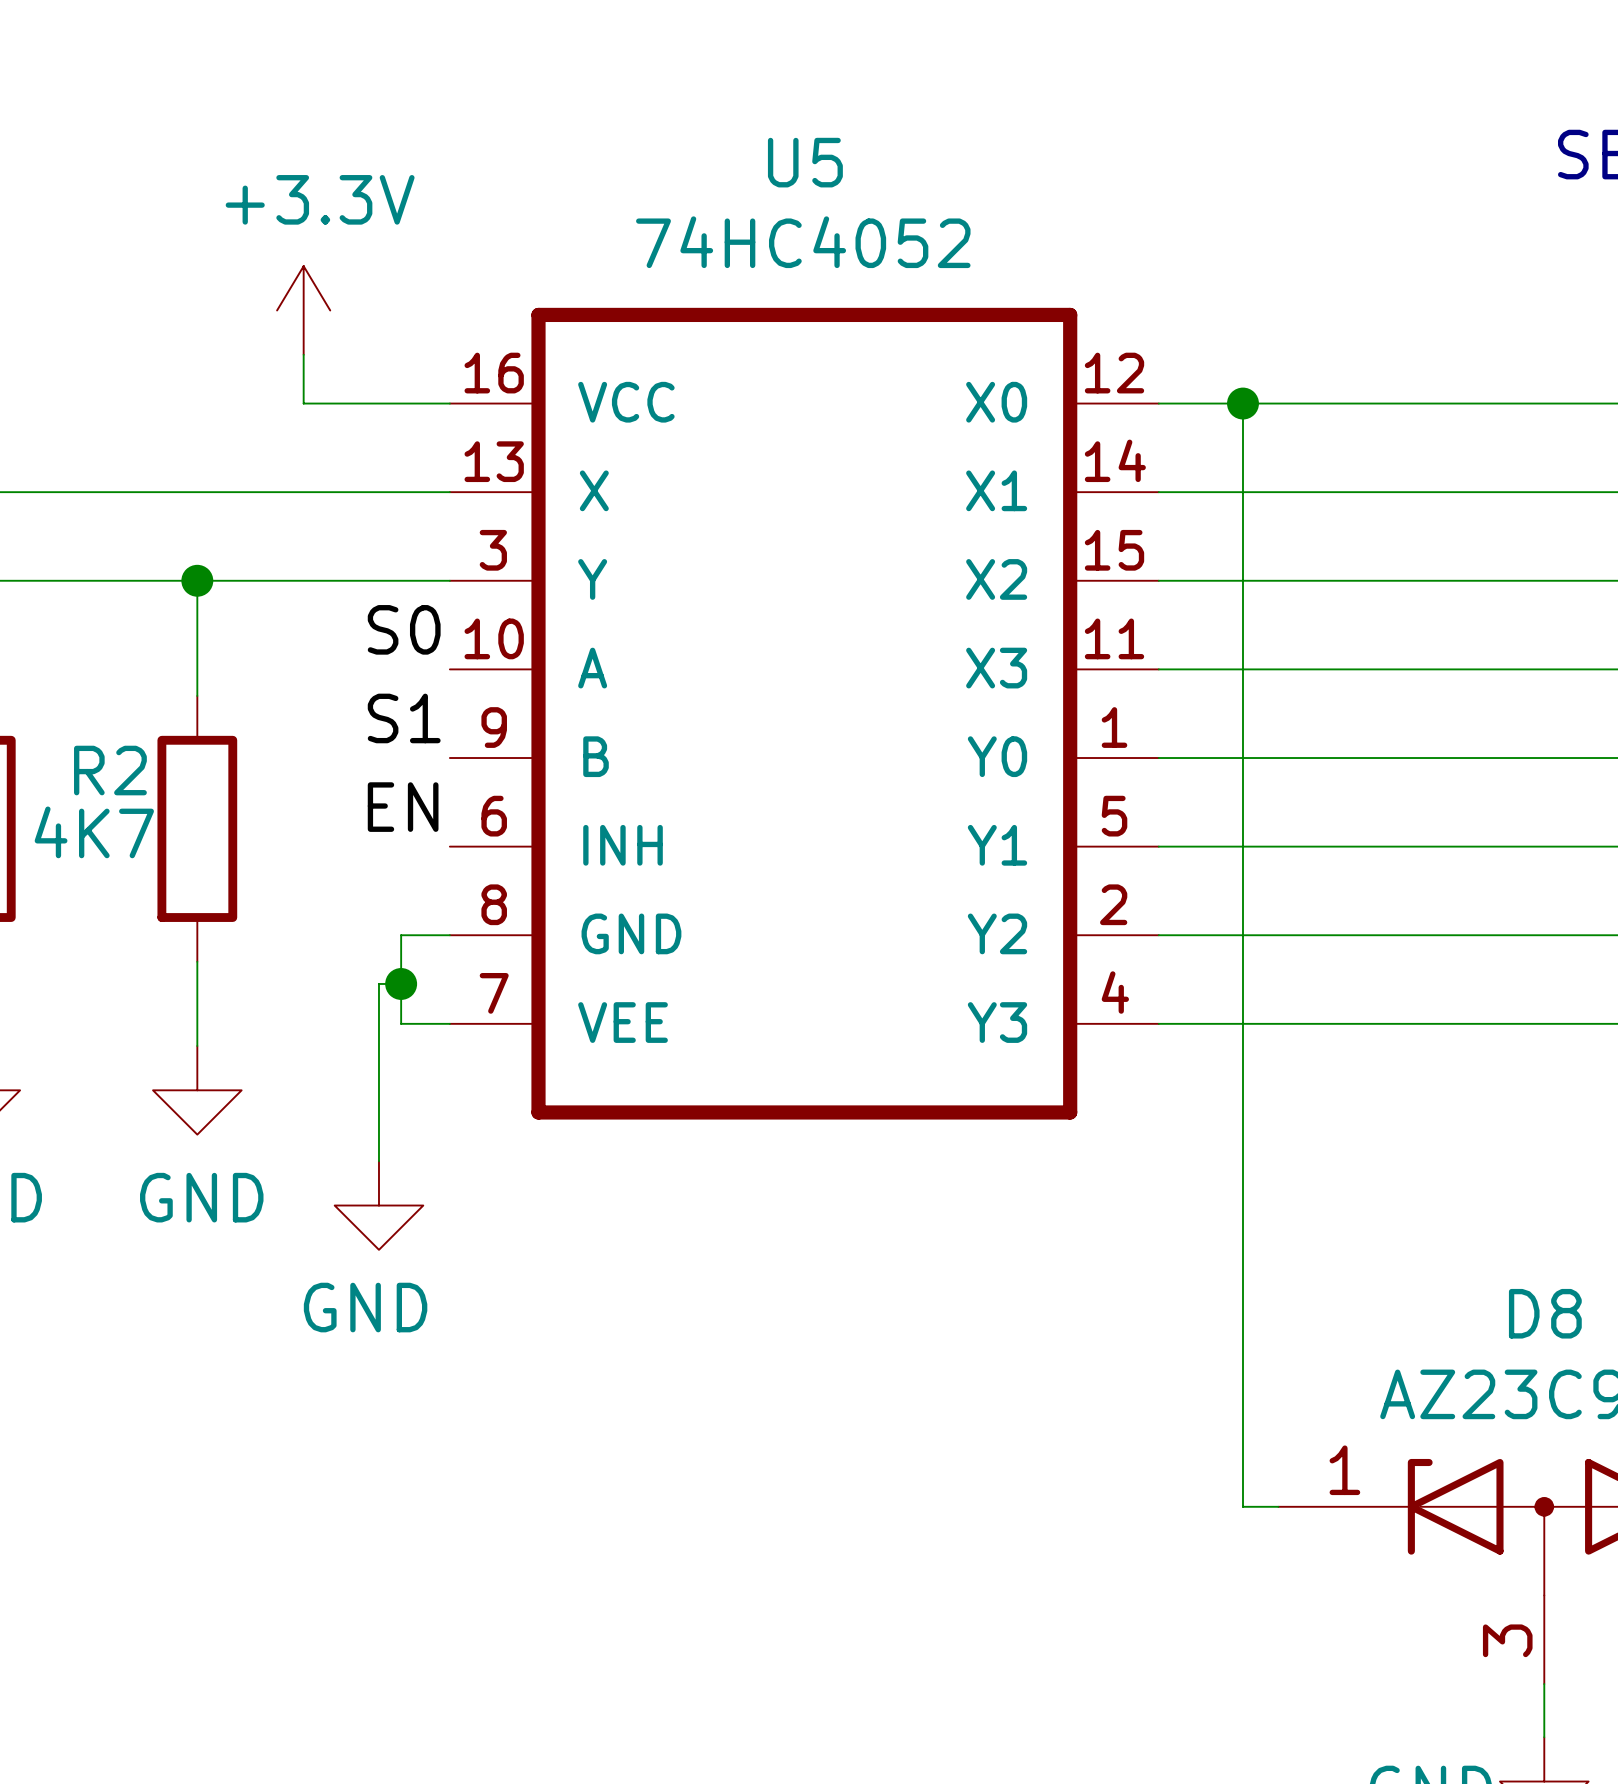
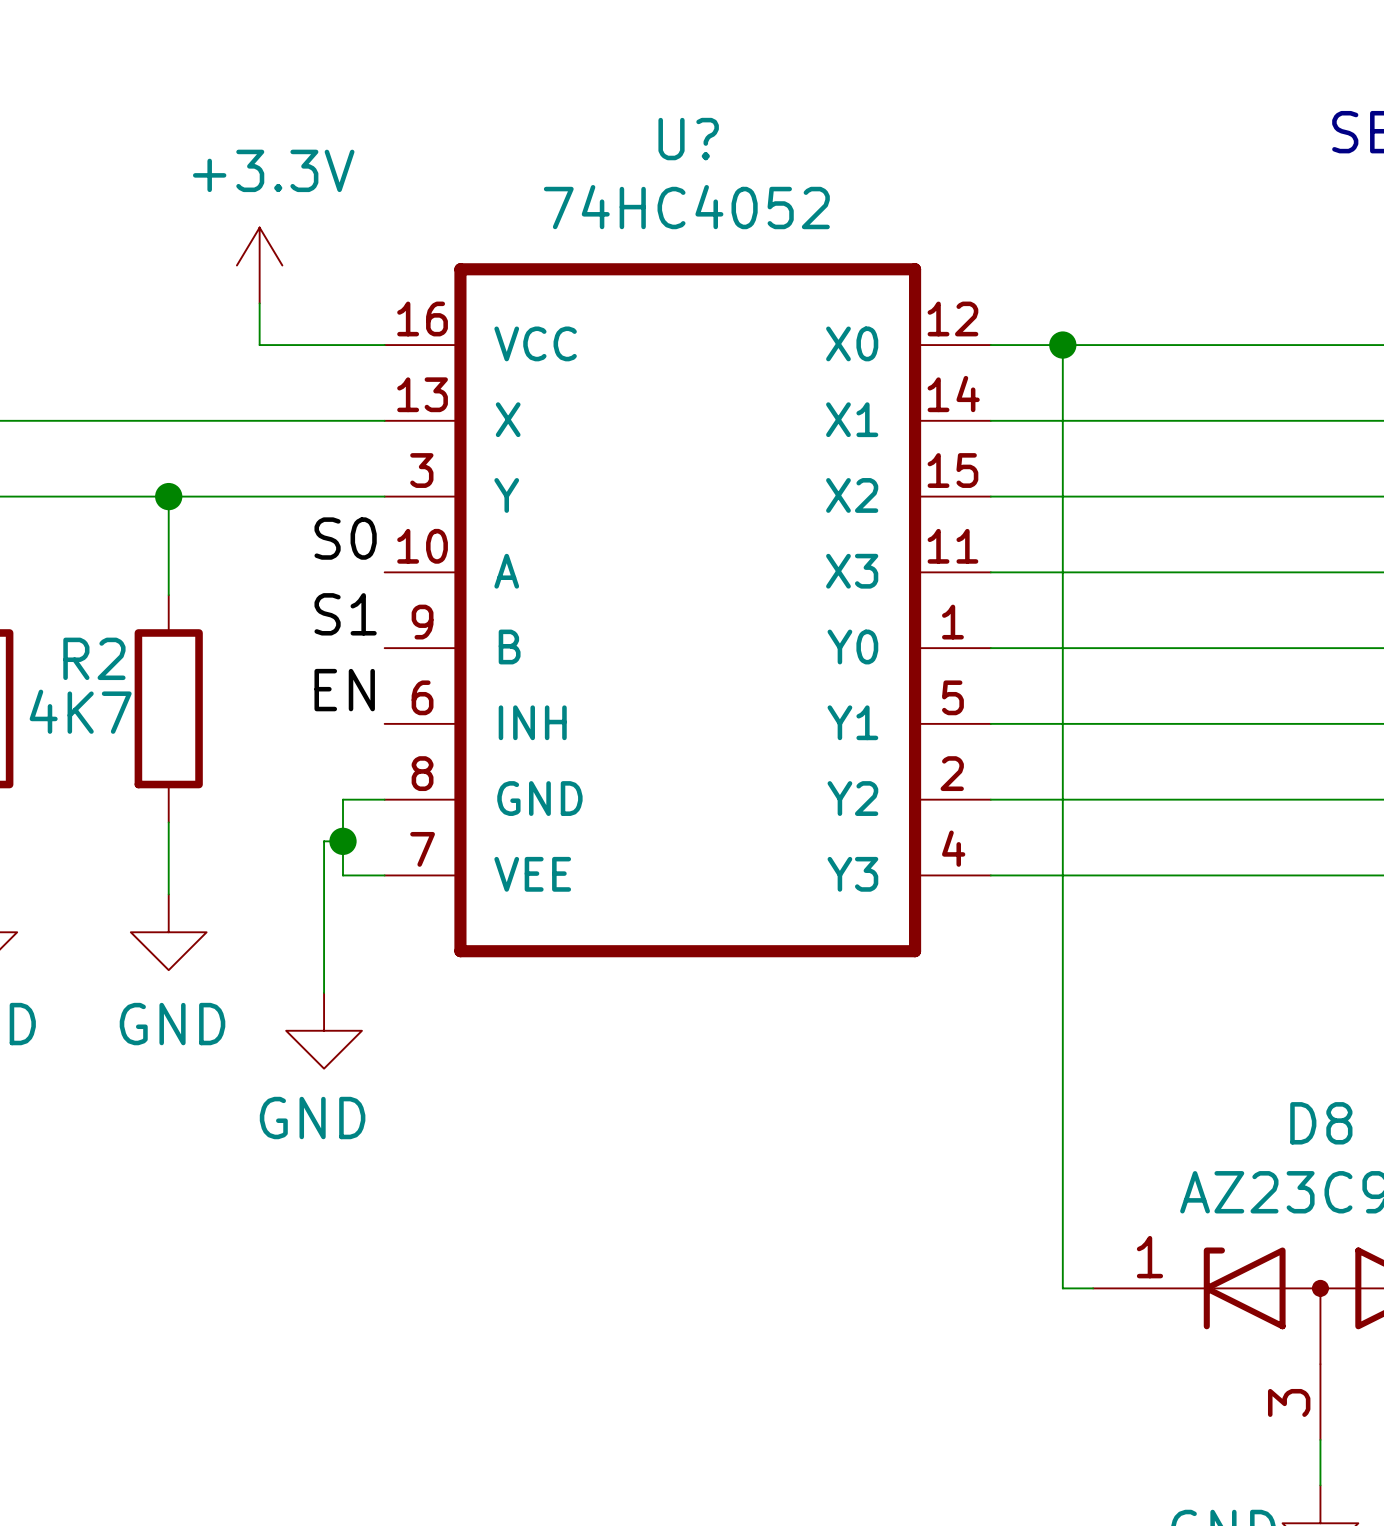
U5 name: U5 (805, 162) -> U? (688, 139)

